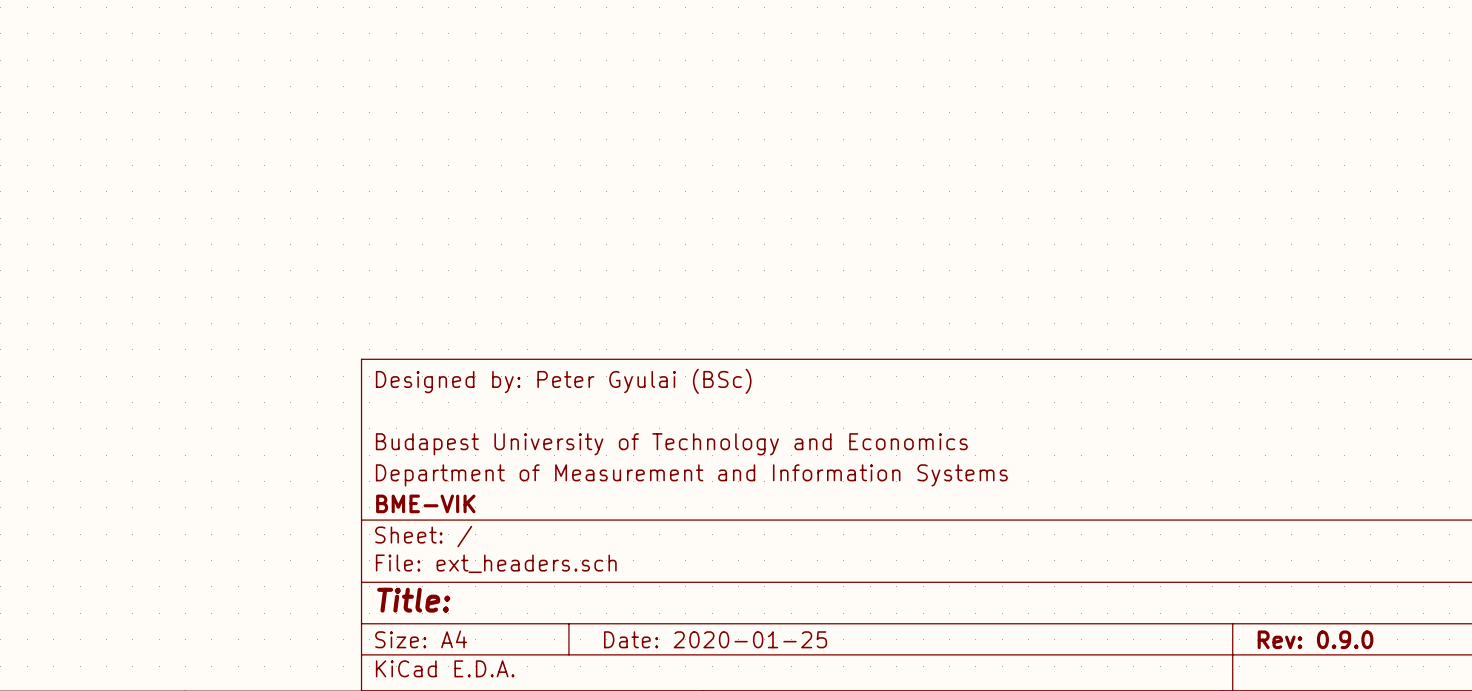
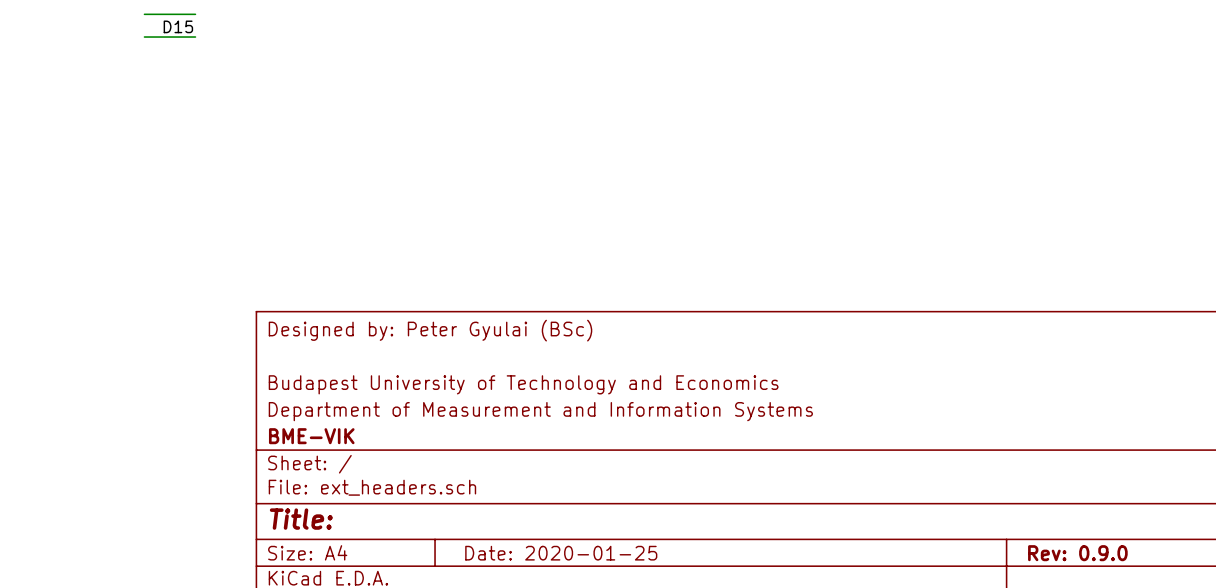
wire: none -> (144, 14) (195, 14)
label: none -> D15 (178, 26)
wire: none -> (144, 37) (195, 37)

